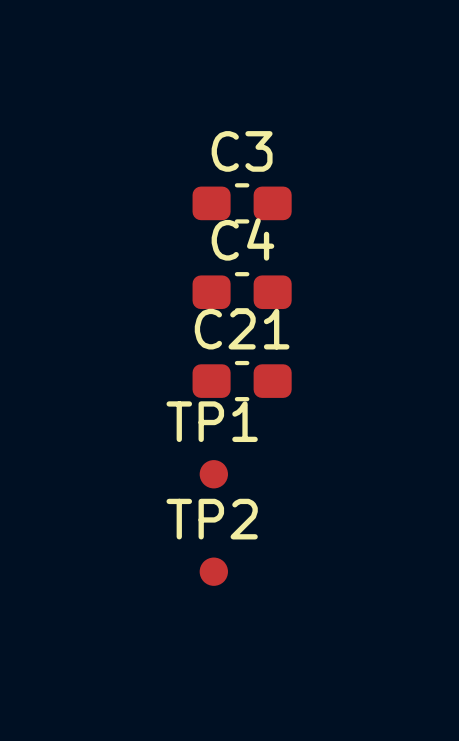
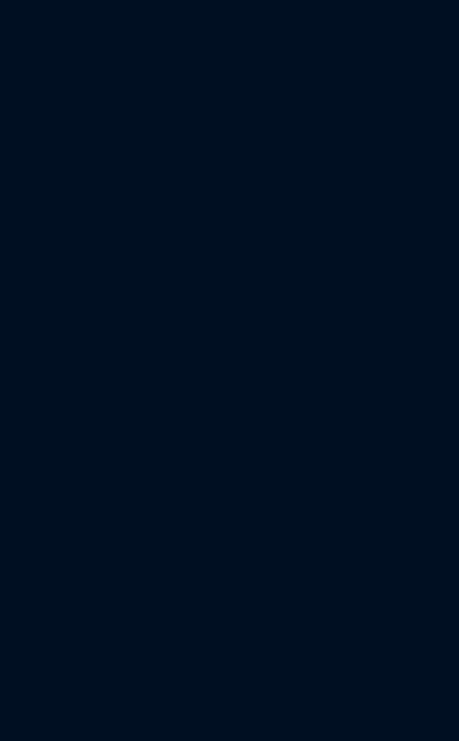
C3: (242, 203) -> none
C4: (242, 292) -> none
C21: (242, 381) -> none
TP1: (213, 474) -> none
TP2: (213, 571) -> none

